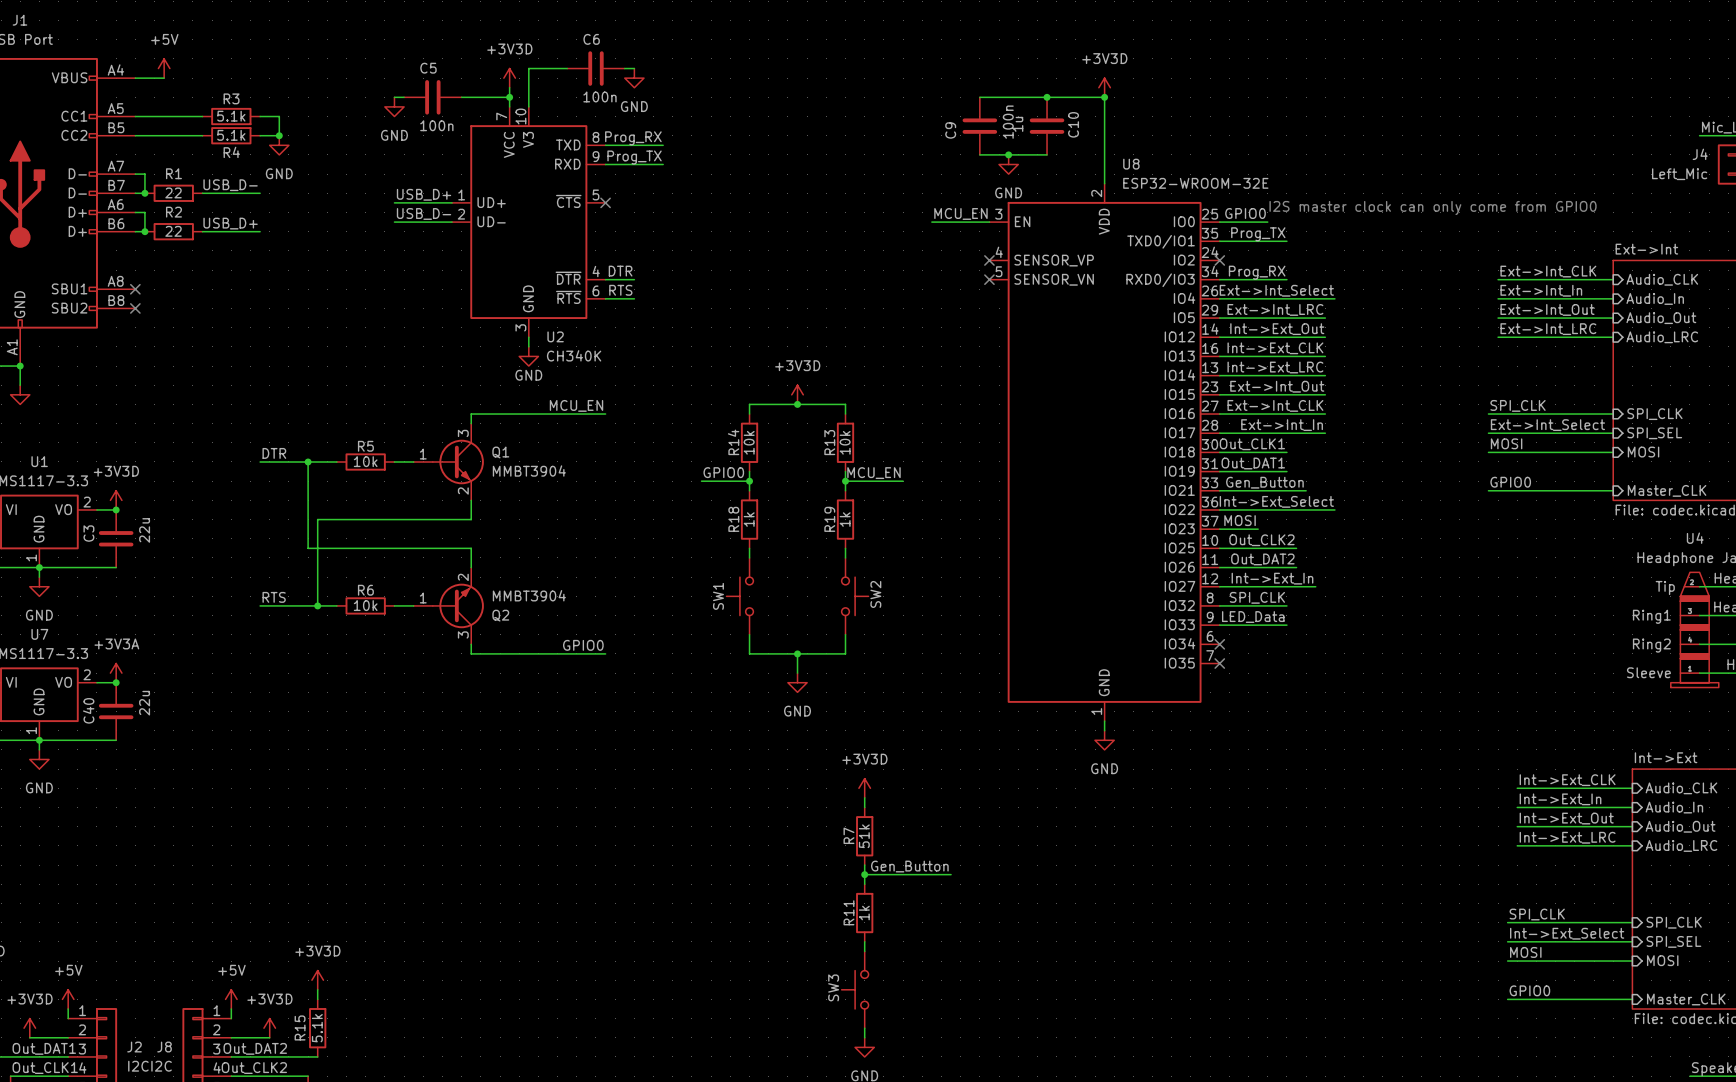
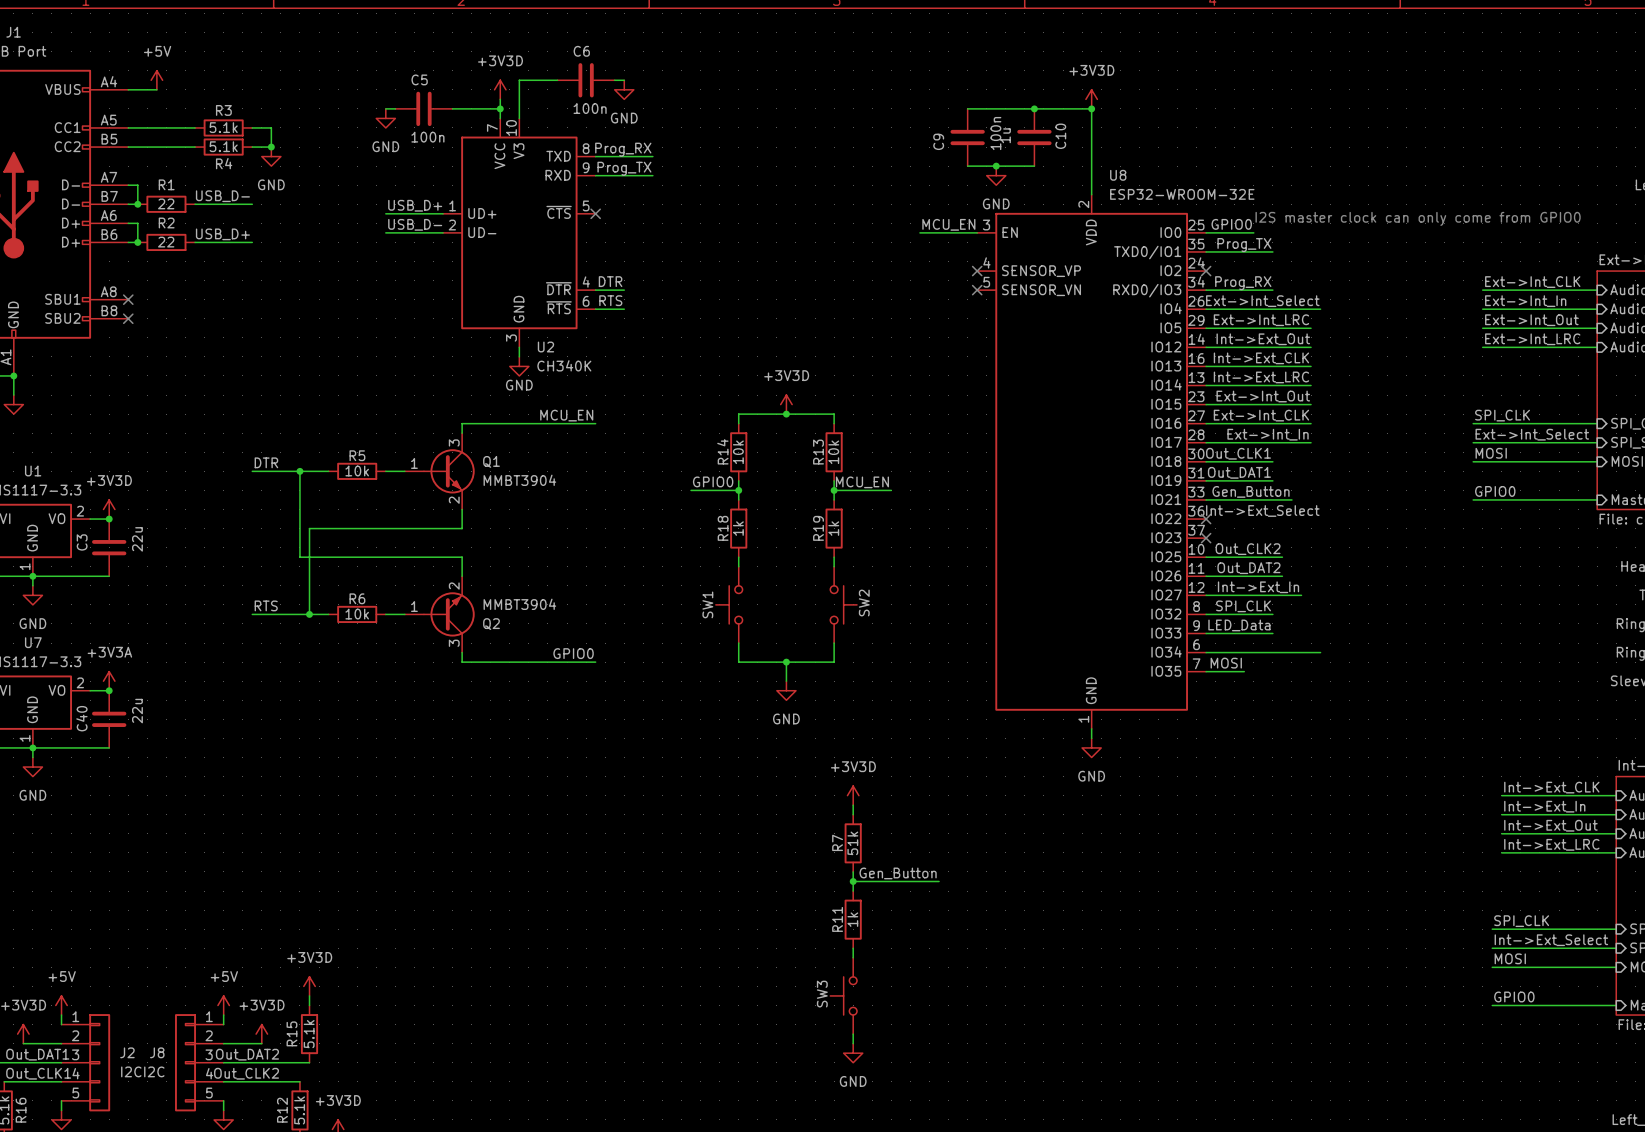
wire: (1219, 509) (1334, 509) -> (1206, 652) (1320, 652)
no-connect mark: none -> (1206, 519)
label position: MOSI (1240, 520) -> MOSI (1226, 663)
wire: (1219, 529) (1258, 529) -> (1206, 671) (1244, 671)
no-connect mark: none -> (1206, 538)
no-connect mark: (1219, 644) -> none
no-connect mark: (1219, 663) -> none

